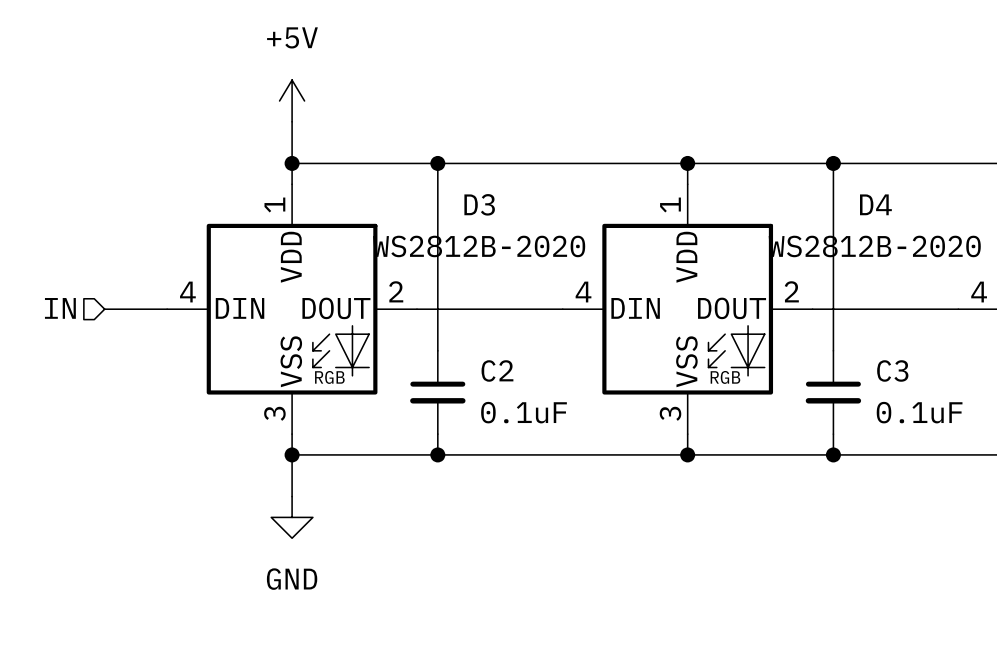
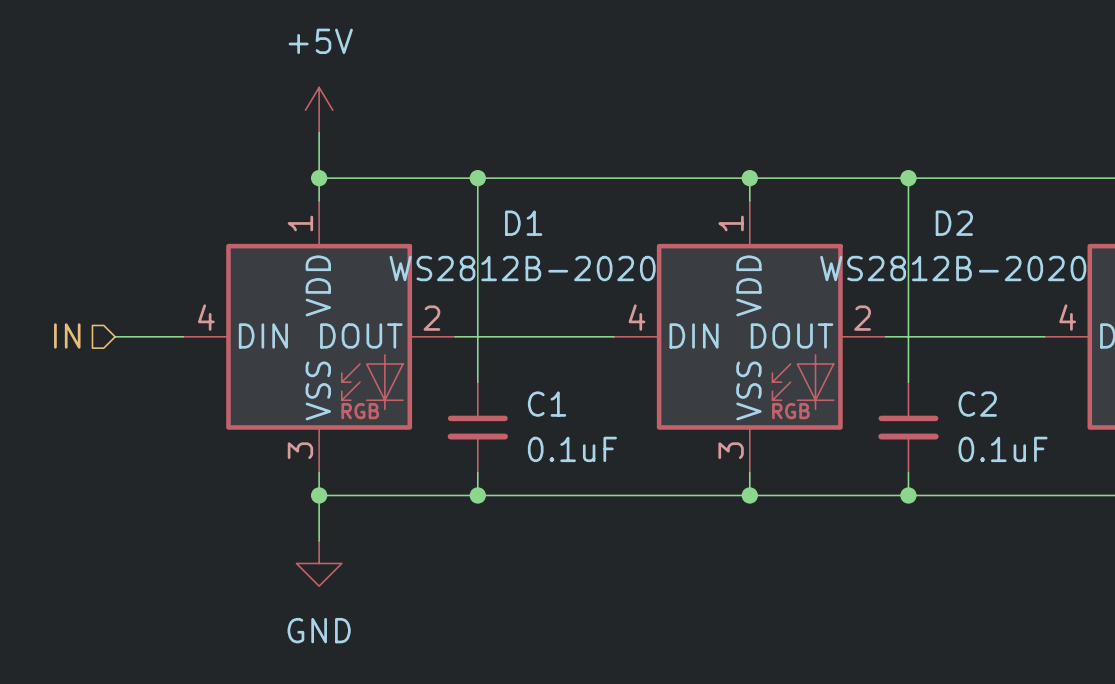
D3 name: D3 (479, 204) -> D1 (523, 223)
D4 name: D4 (875, 204) -> D2 (954, 223)
C2 name: C2 (497, 370) -> C1 (547, 404)
C3 name: C3 (892, 370) -> C2 (977, 404)

